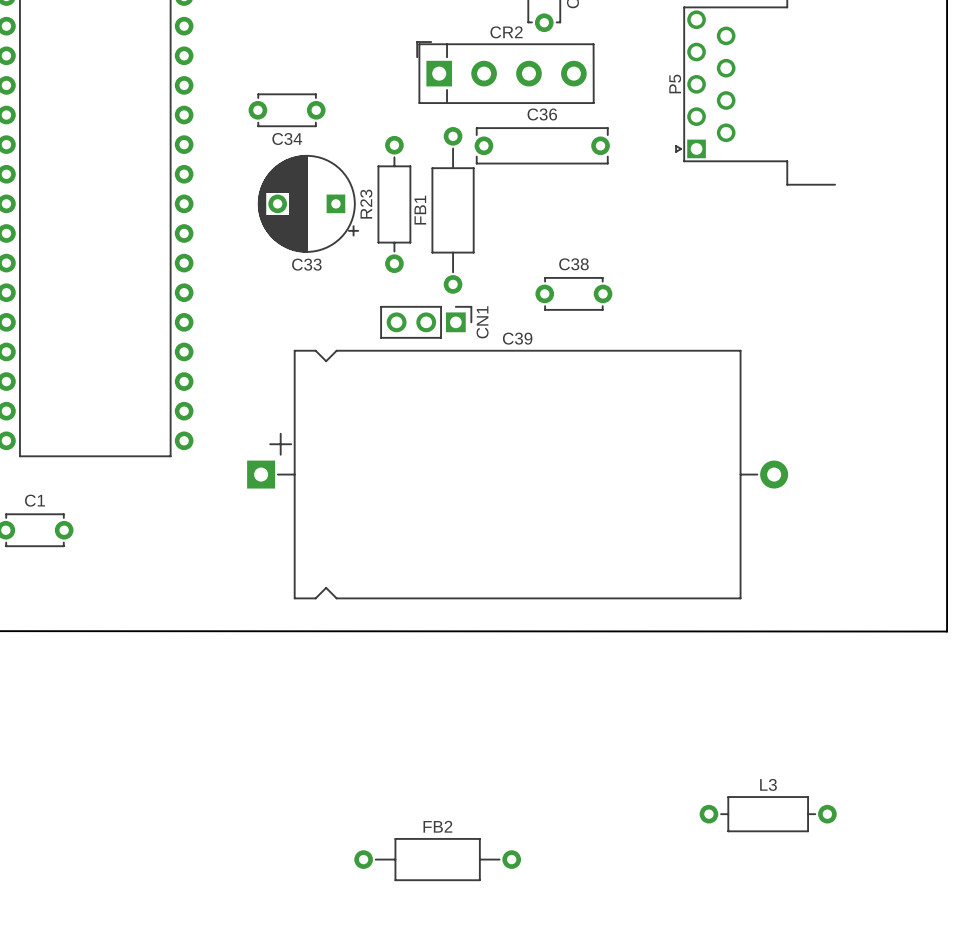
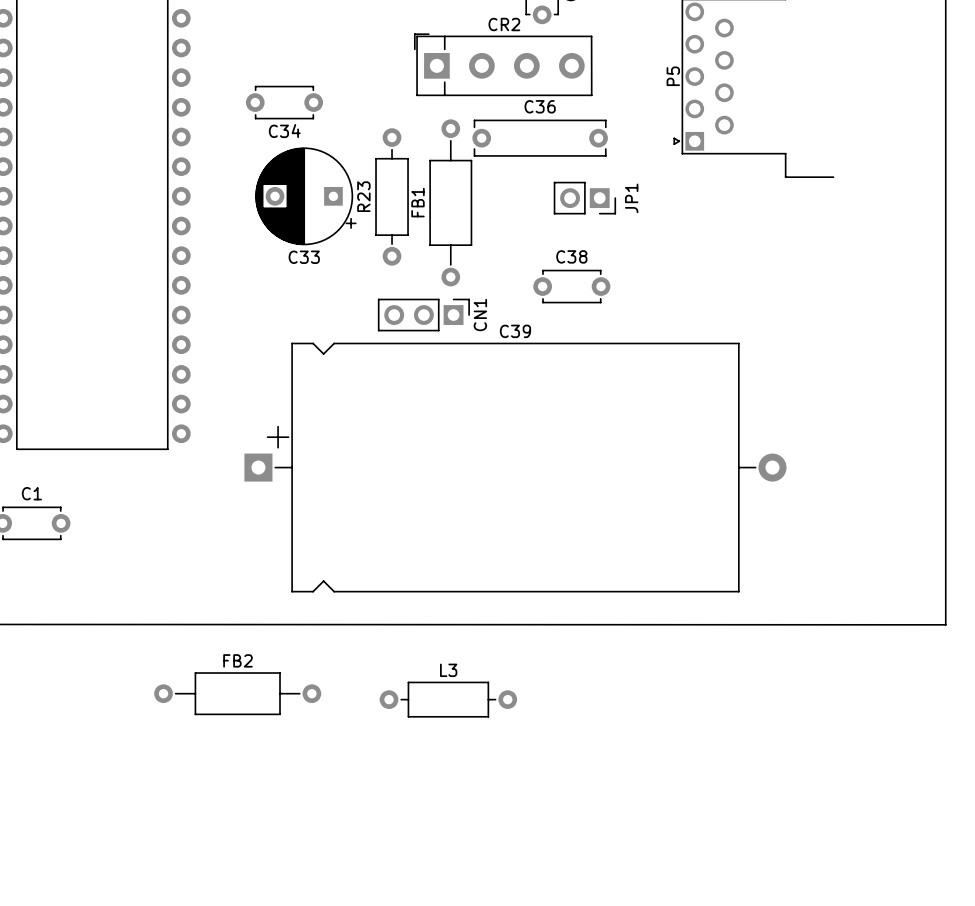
JP1: none -> (584, 198)
L3 position: (768, 814) -> (448, 699)
FB2 position: (437, 859) -> (237, 693)

